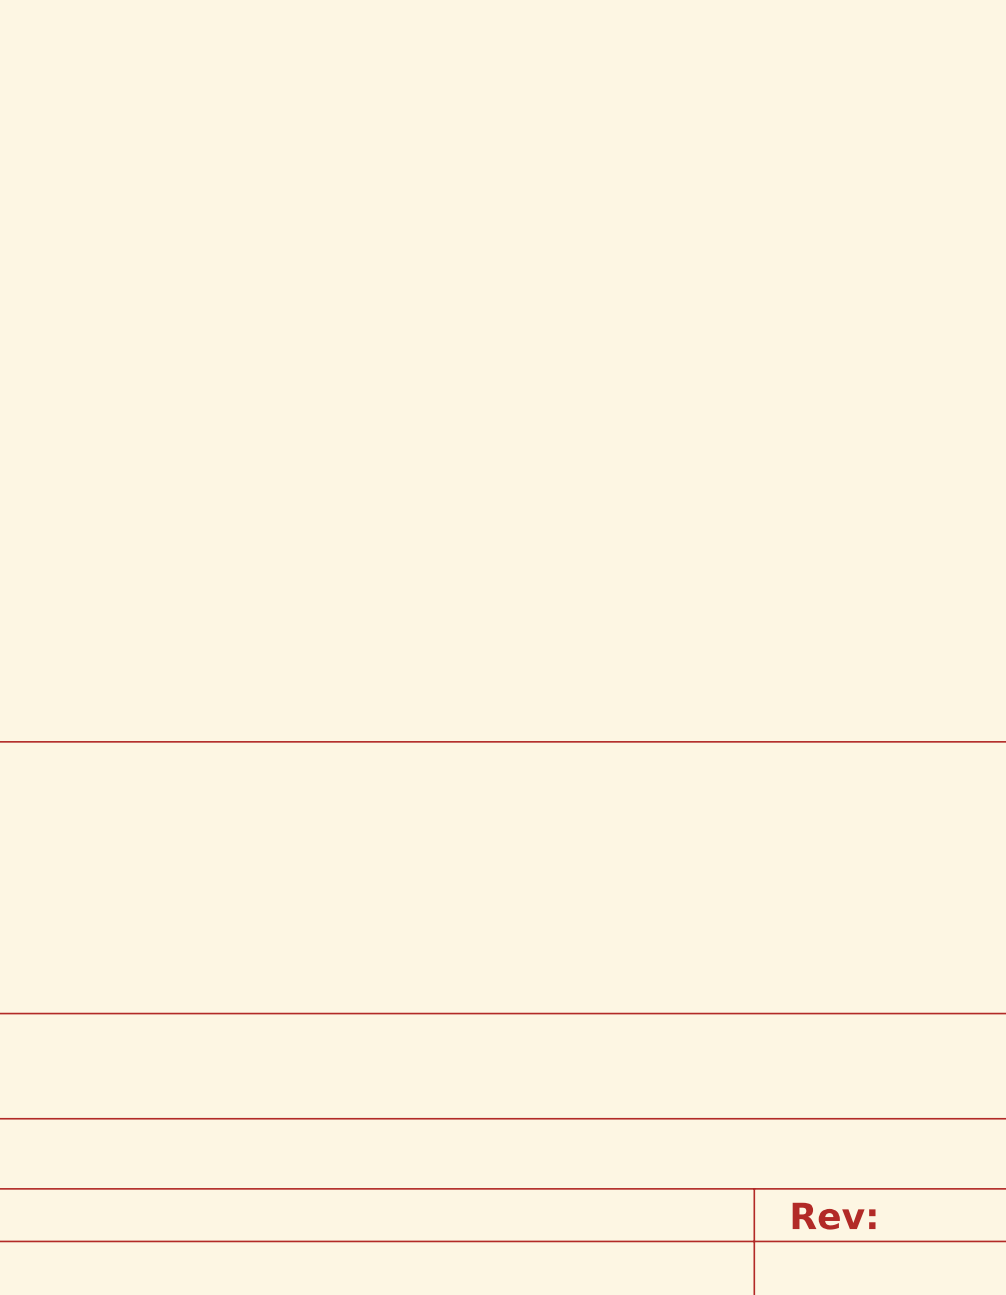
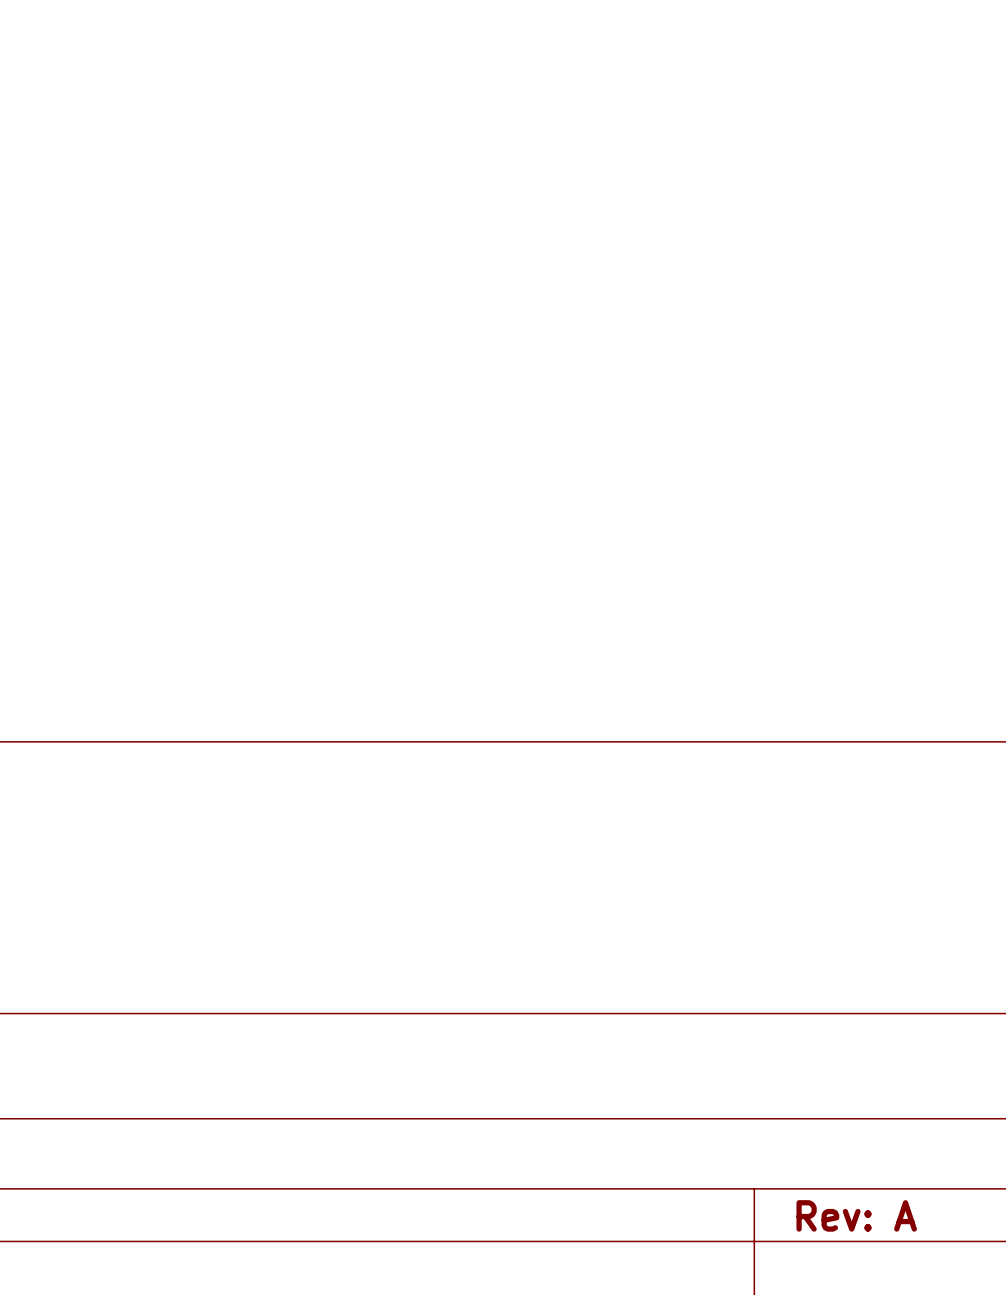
title block: Rev: (834, 1216) -> Rev: A (856, 1215)

